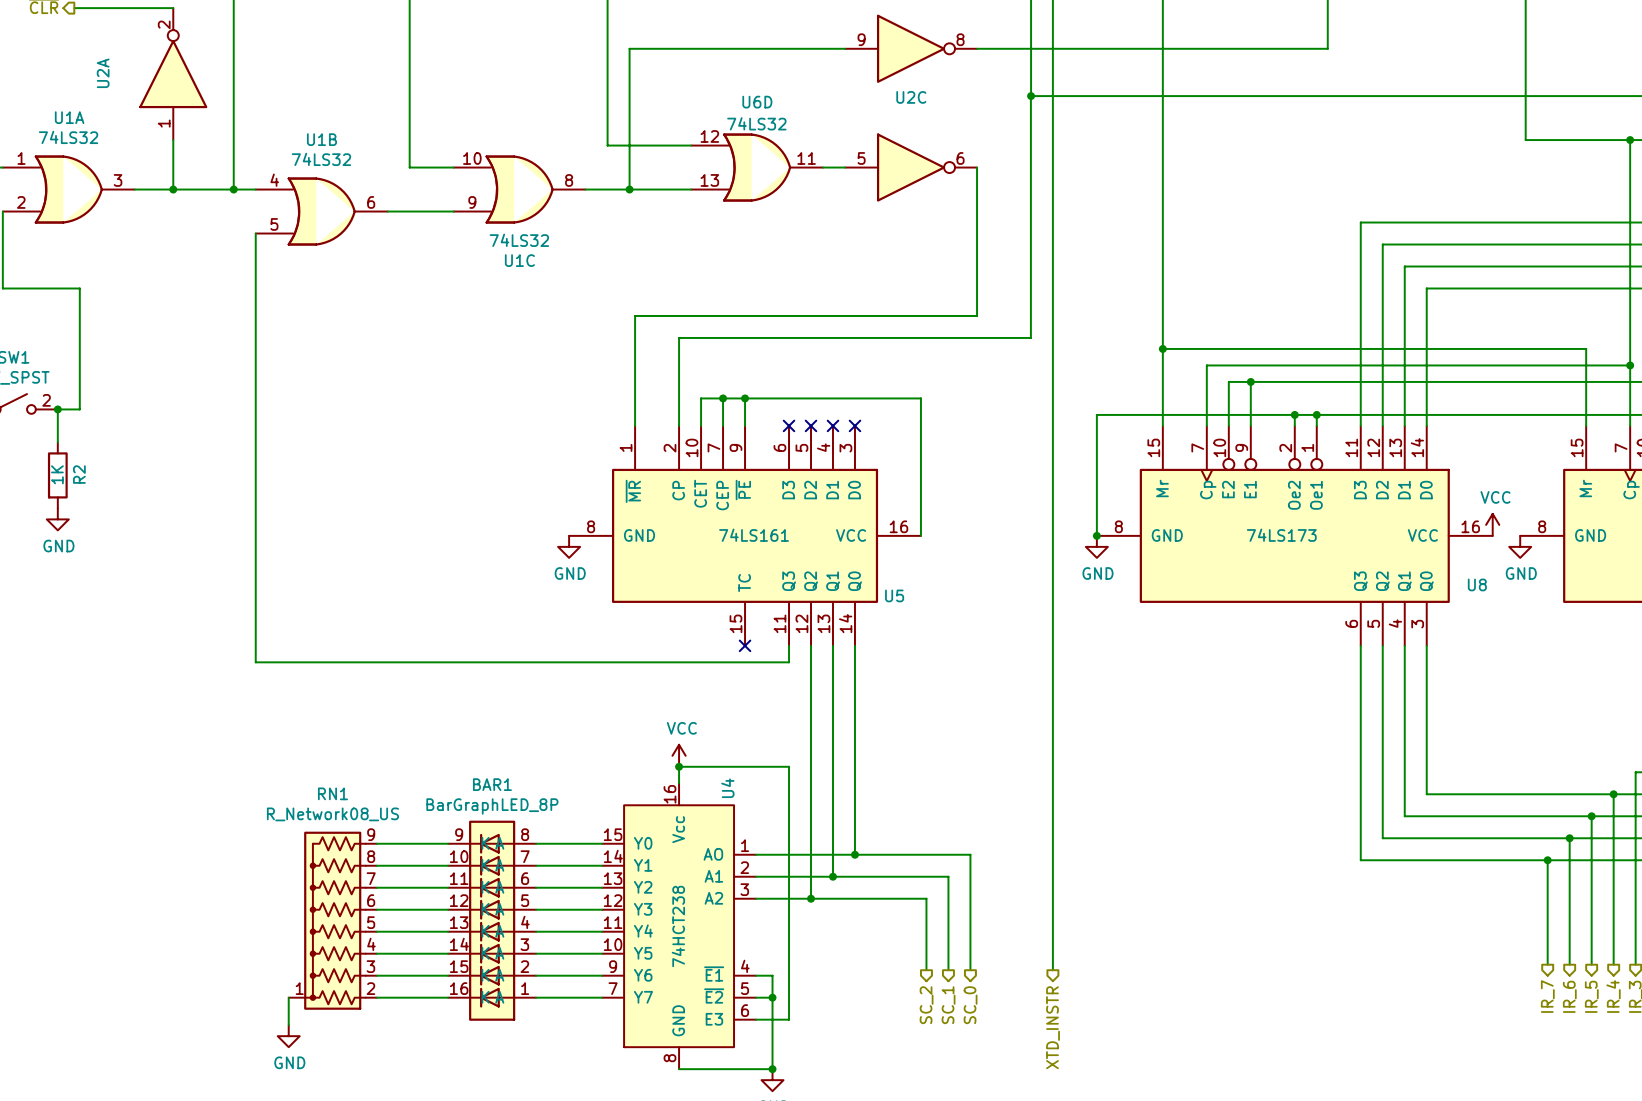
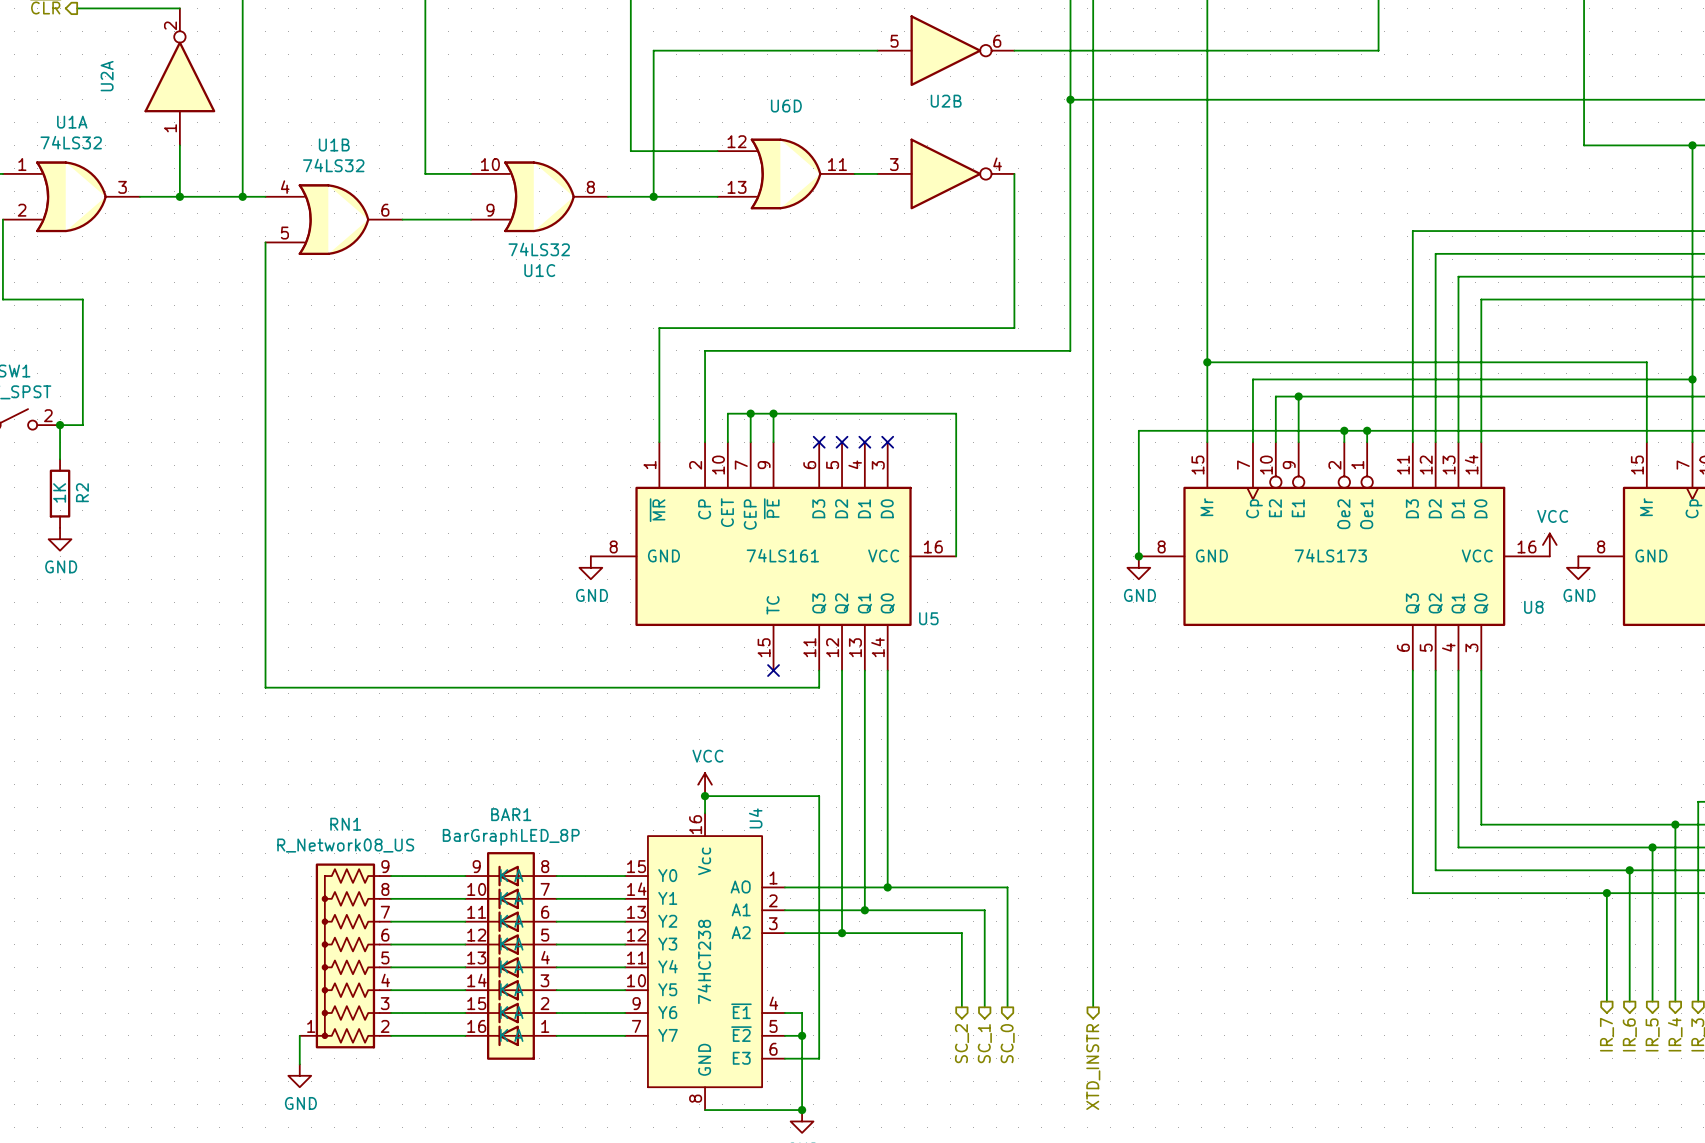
part pin number: 9 (861, 39) -> 5 (894, 41)
part pin number: 8 (960, 39) -> 6 (997, 41)
U2C name: U2C (911, 97) -> U2B (946, 101)
U6D value: 74LS32 (756, 123) -> none
U2C pin number: 5 (861, 158) -> 3 (894, 164)
U2C pin number: 6 (960, 158) -> 4 (997, 164)

